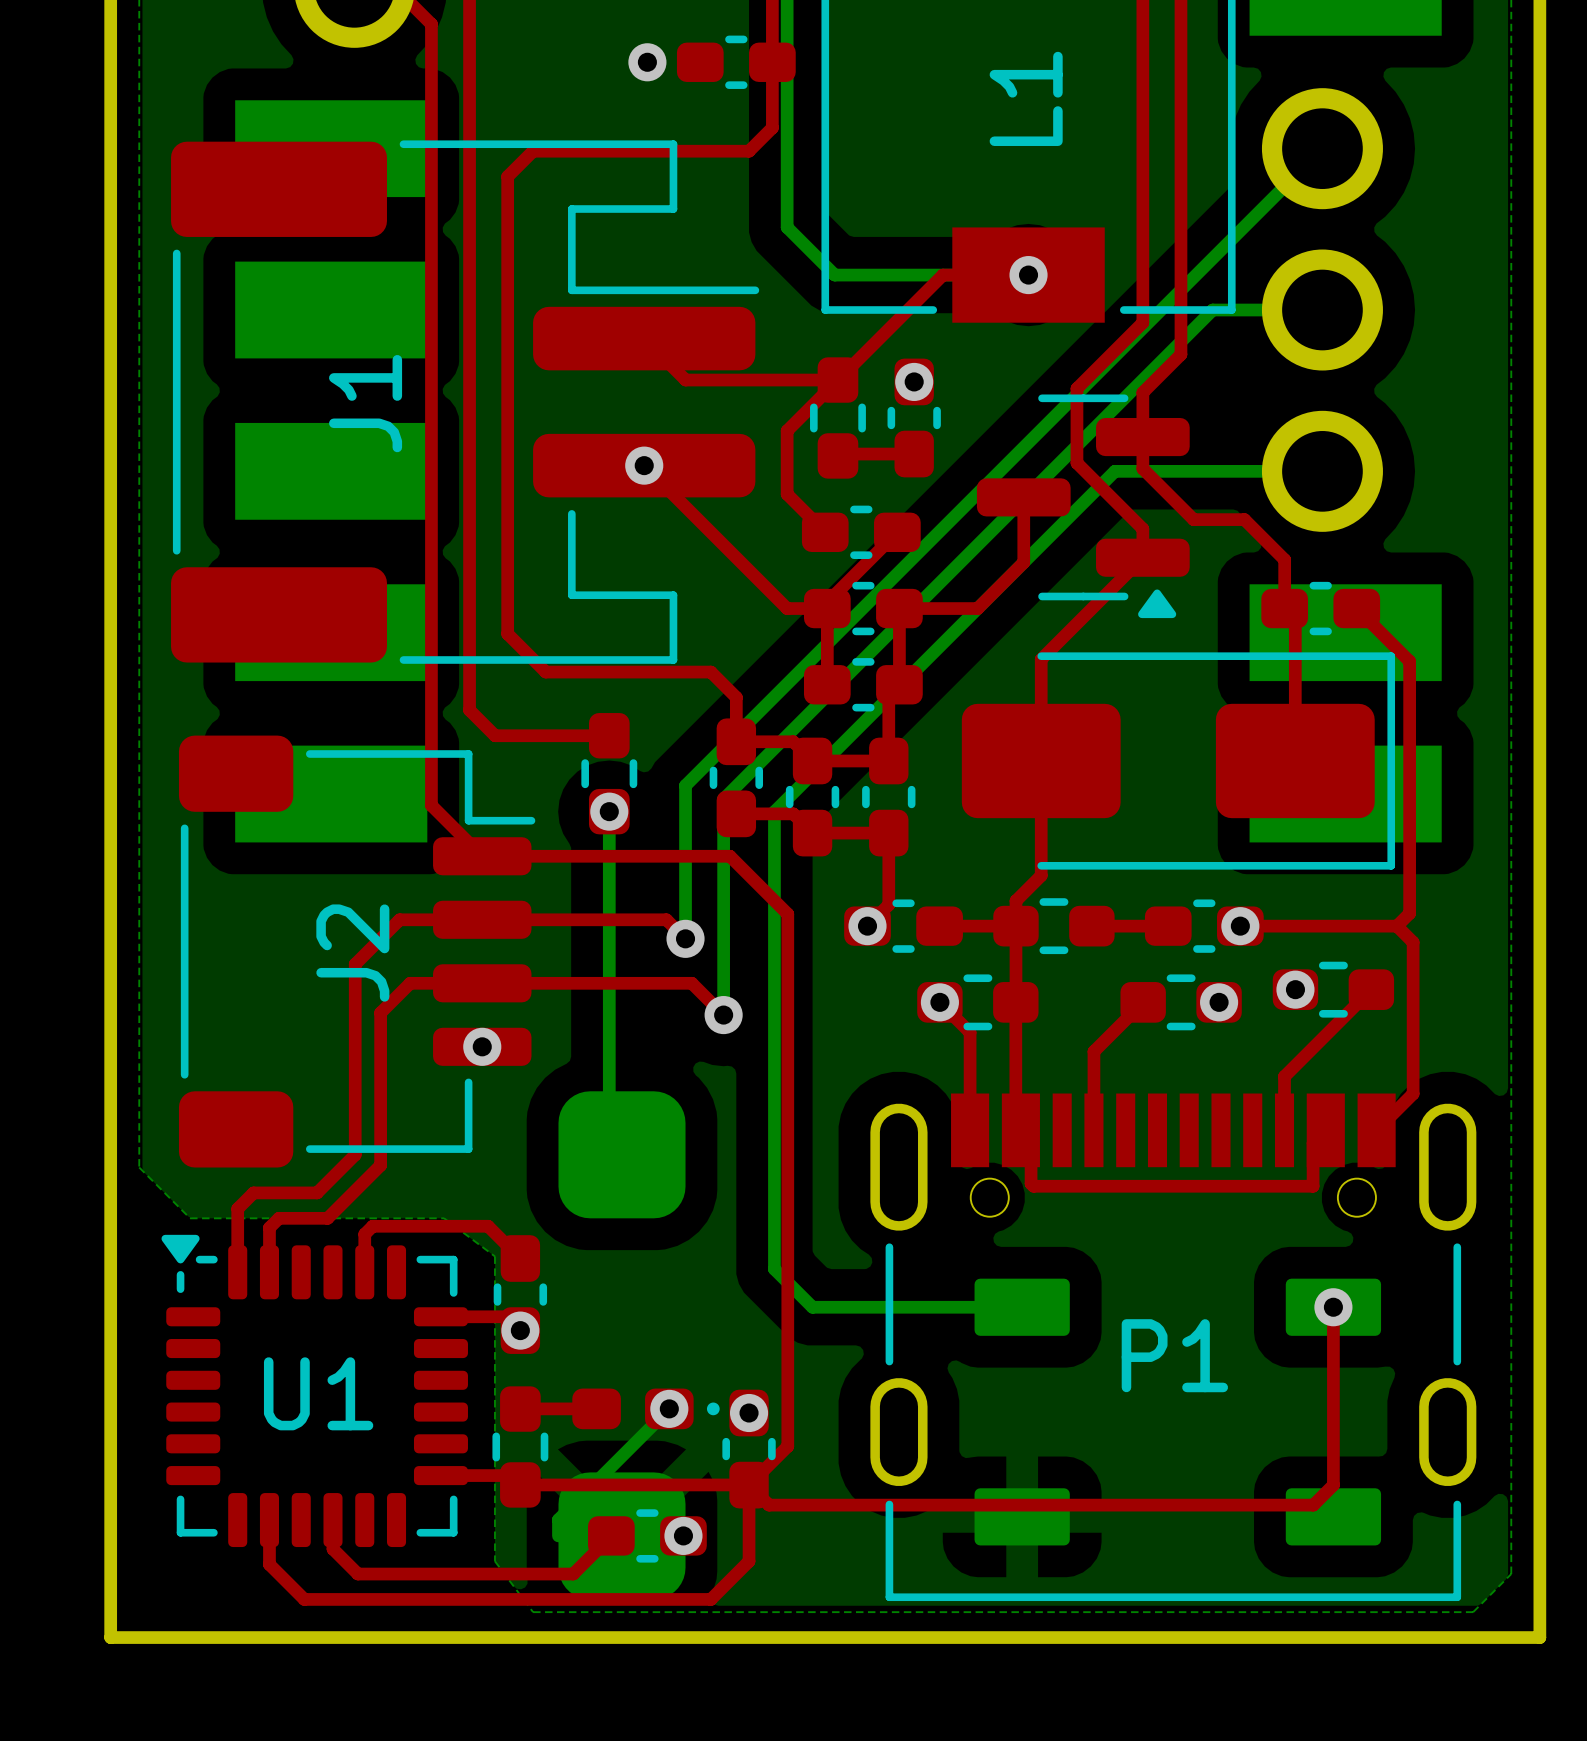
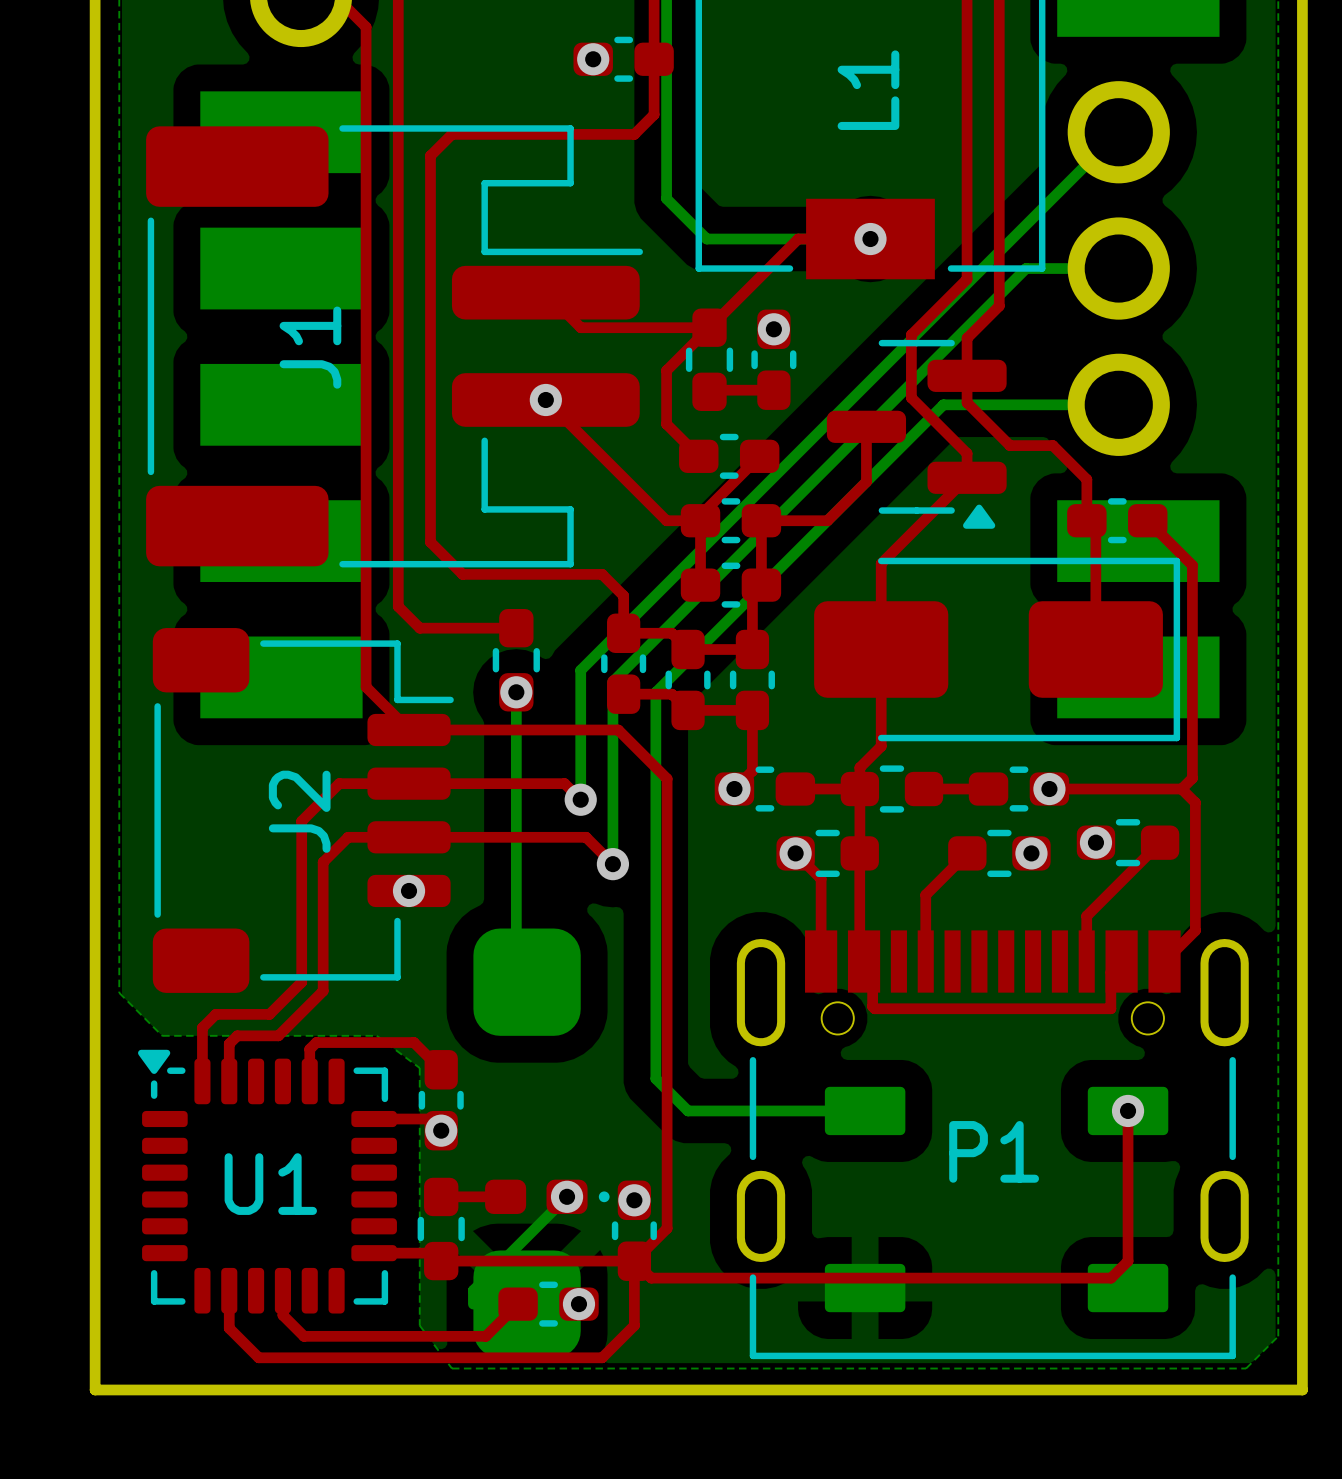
via position: (647, 62) -> (593, 59)

